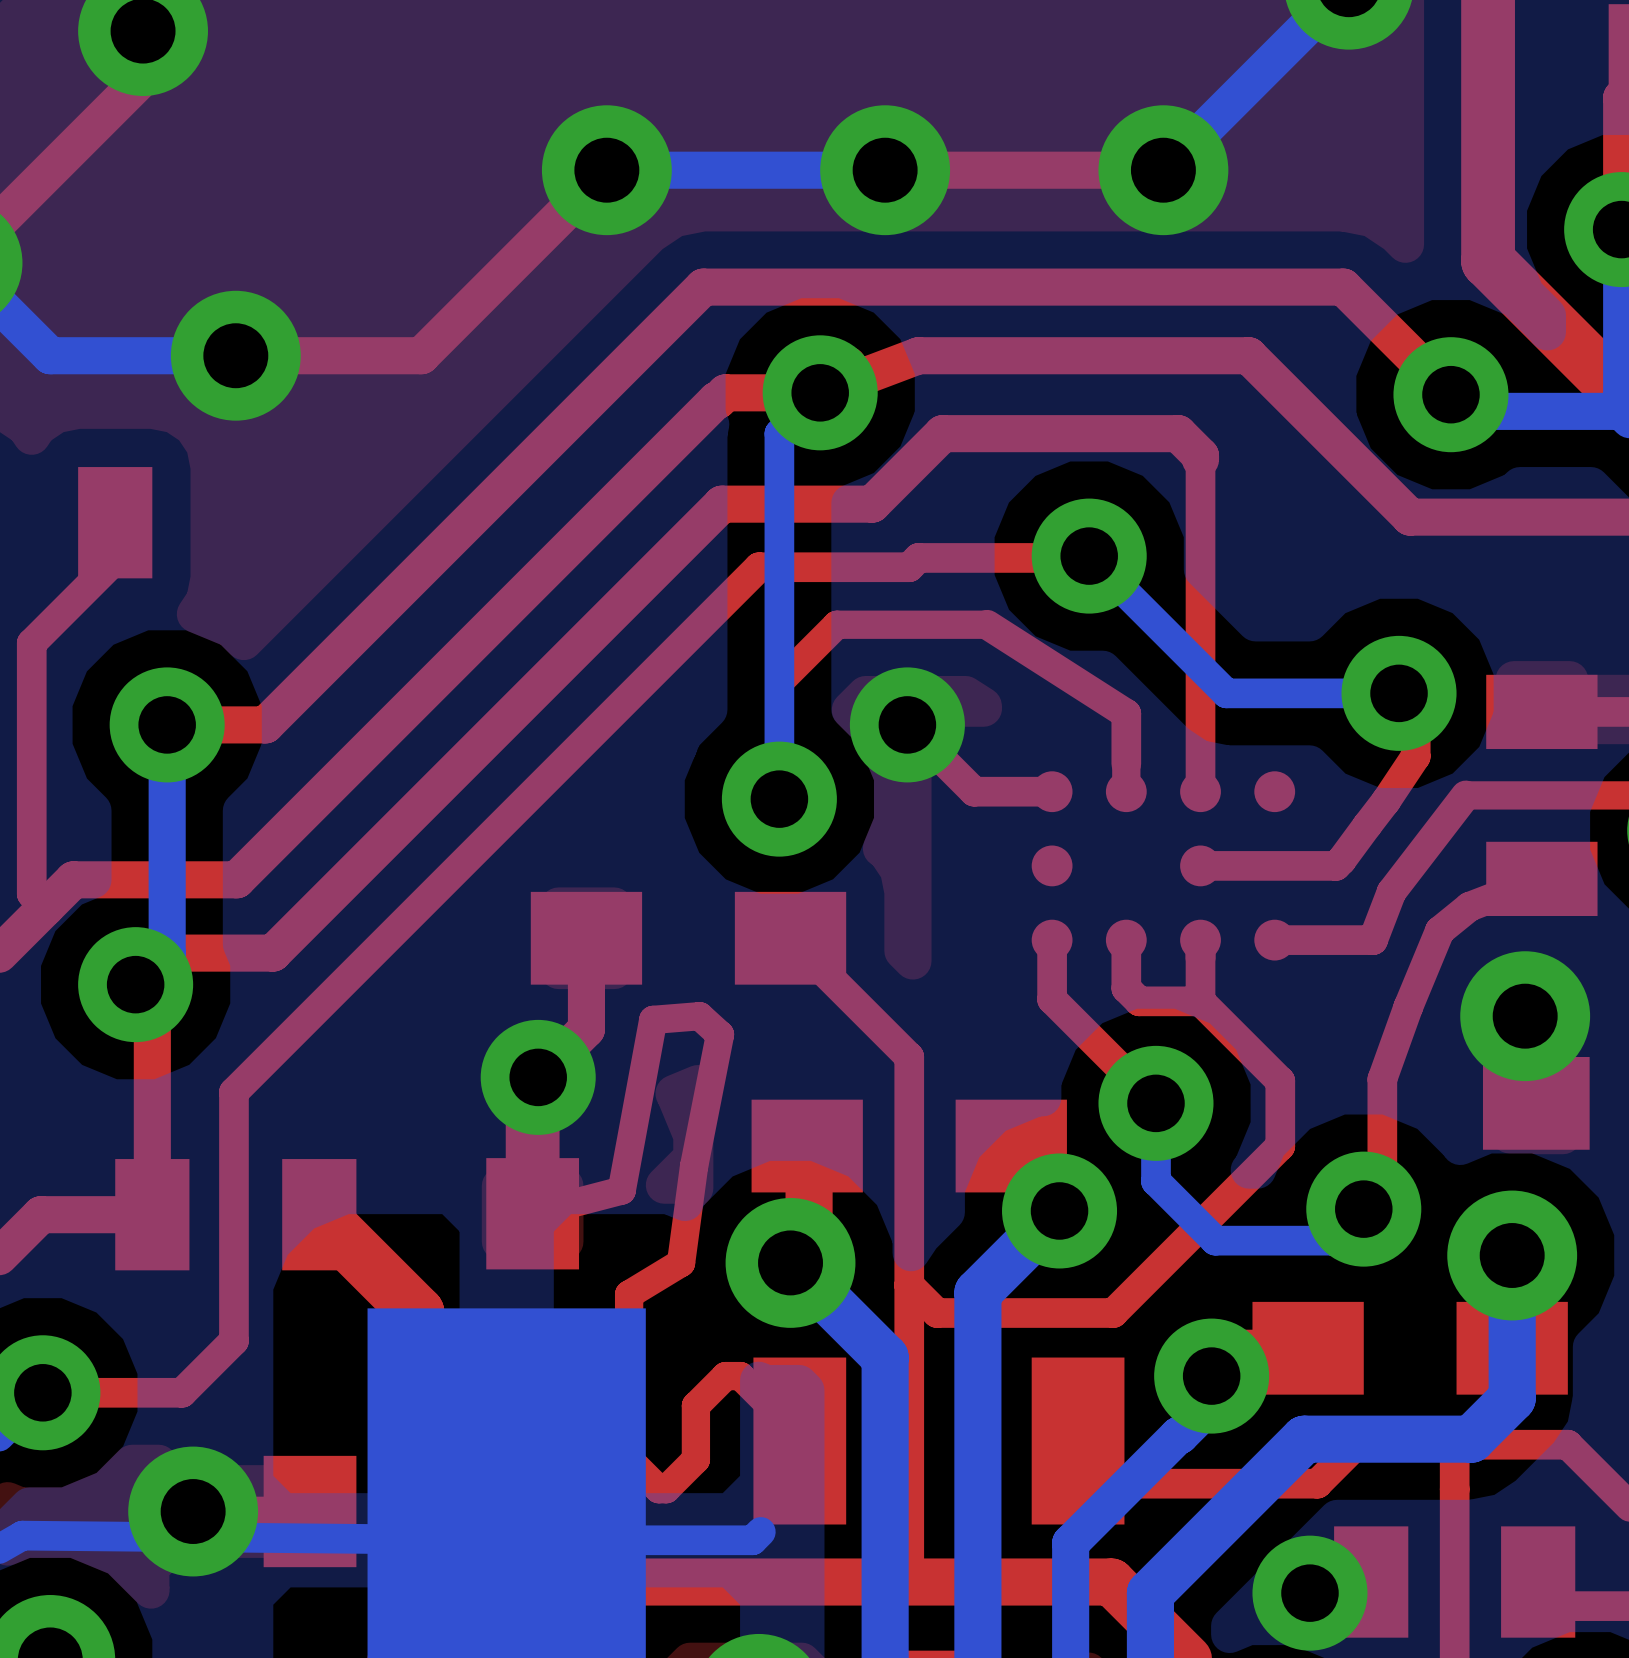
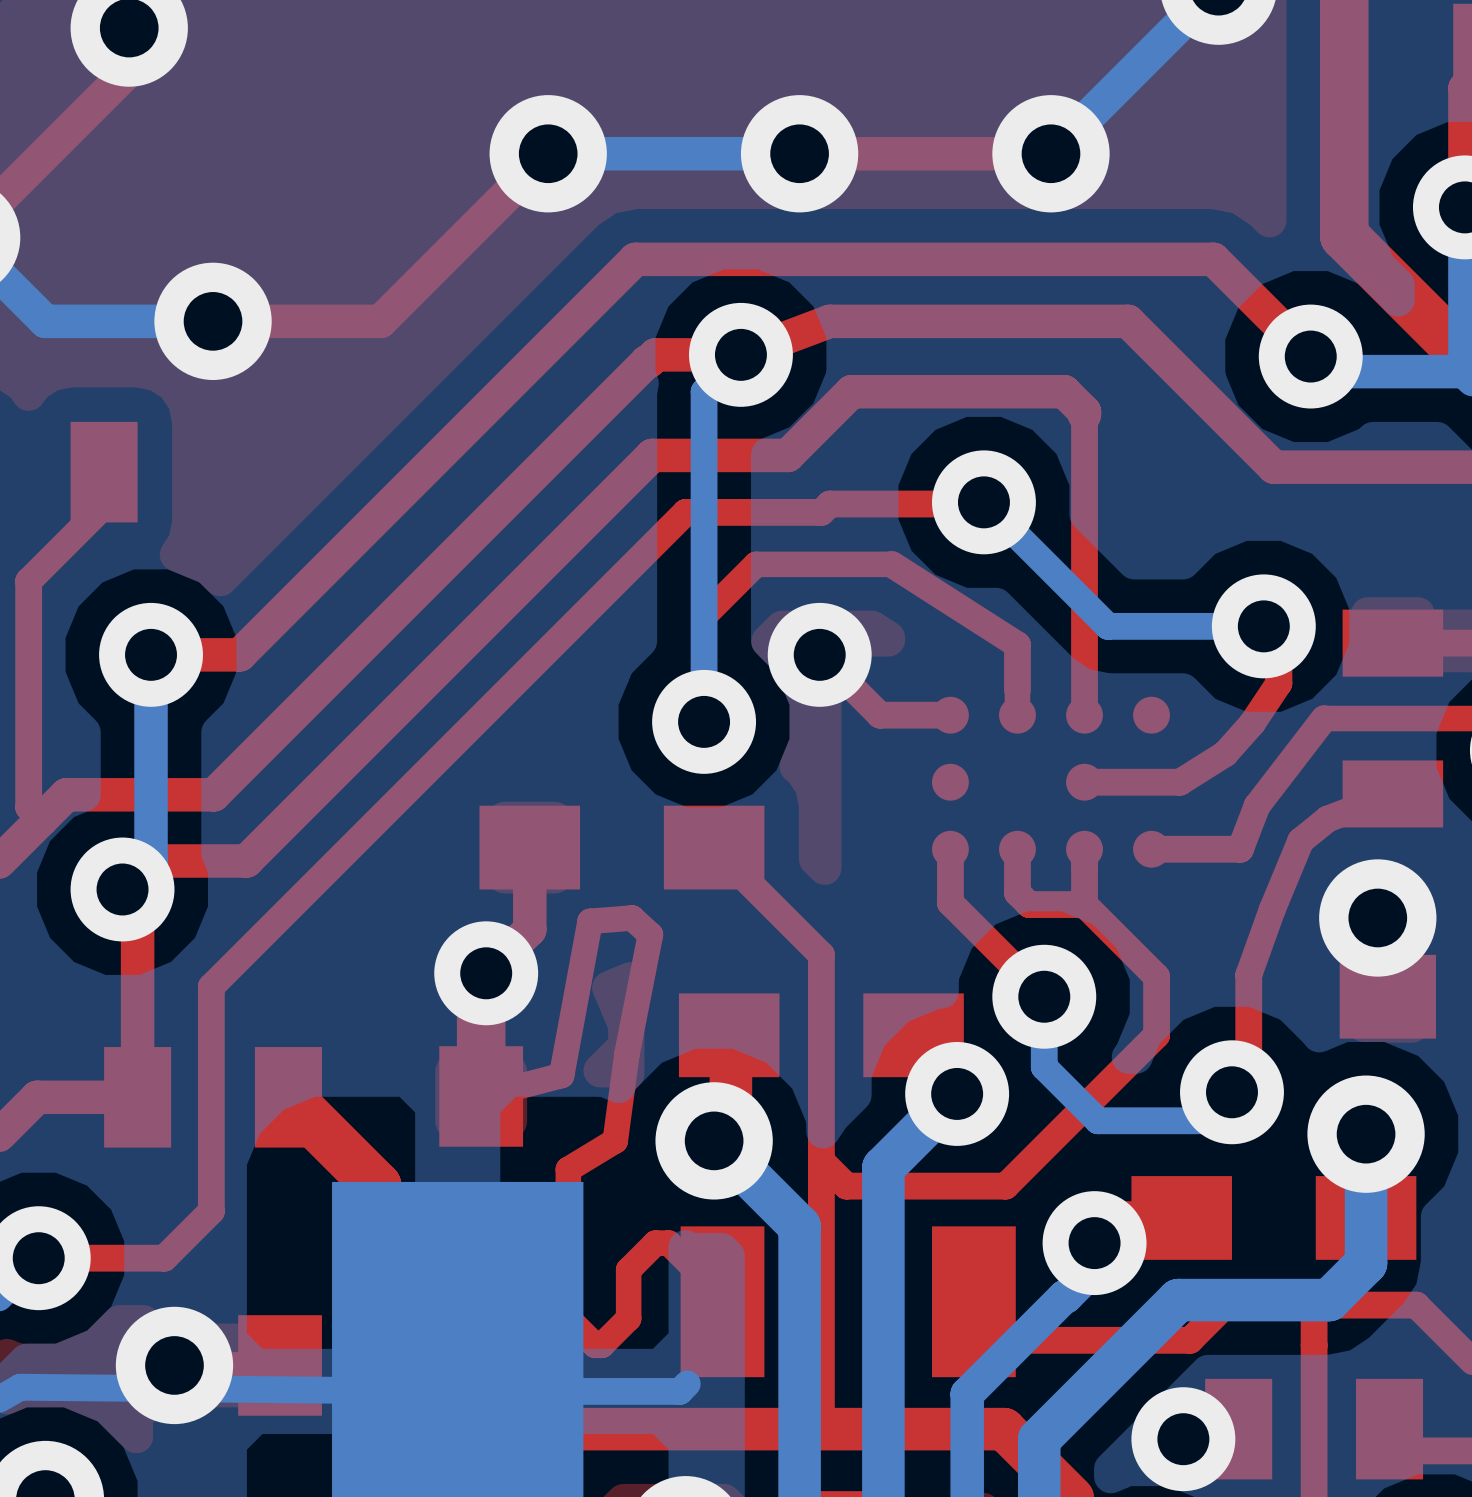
top track: (1386, 800) (1335, 865) (1306, 865) -> (1252, 723) (1225, 753) (1180, 782)

